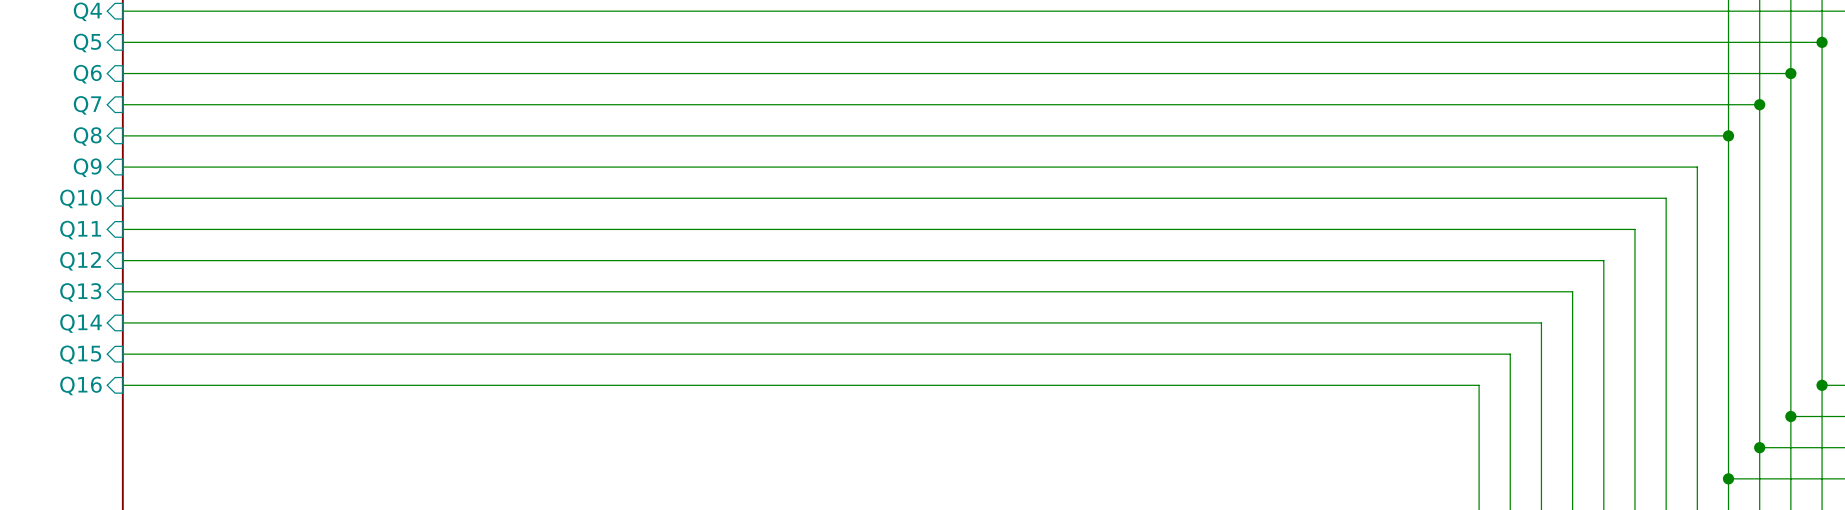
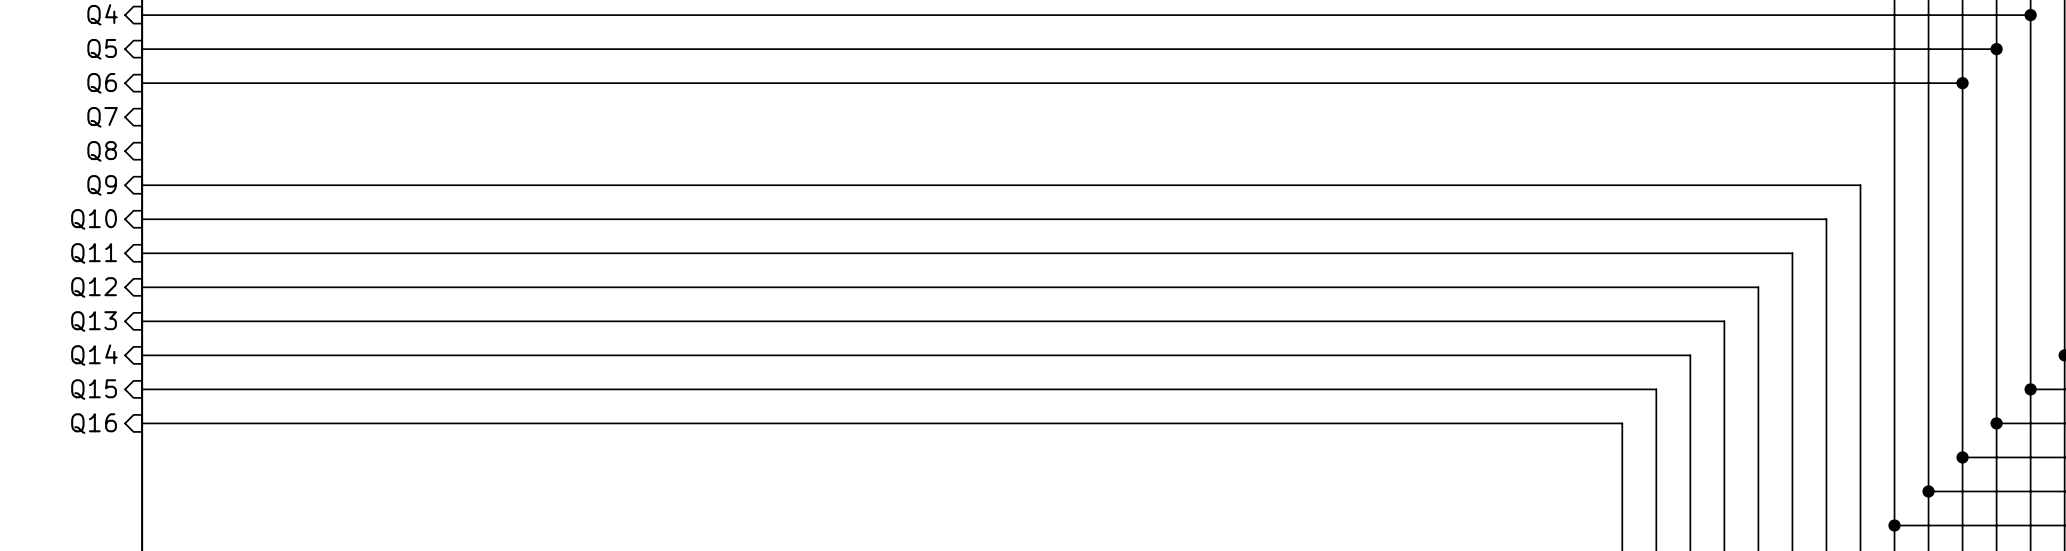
wire: (122, 104) (1759, 104) -> none
junction: (1759, 104) -> none
wire: (122, 135) (1728, 135) -> none
junction: (1728, 135) -> none

